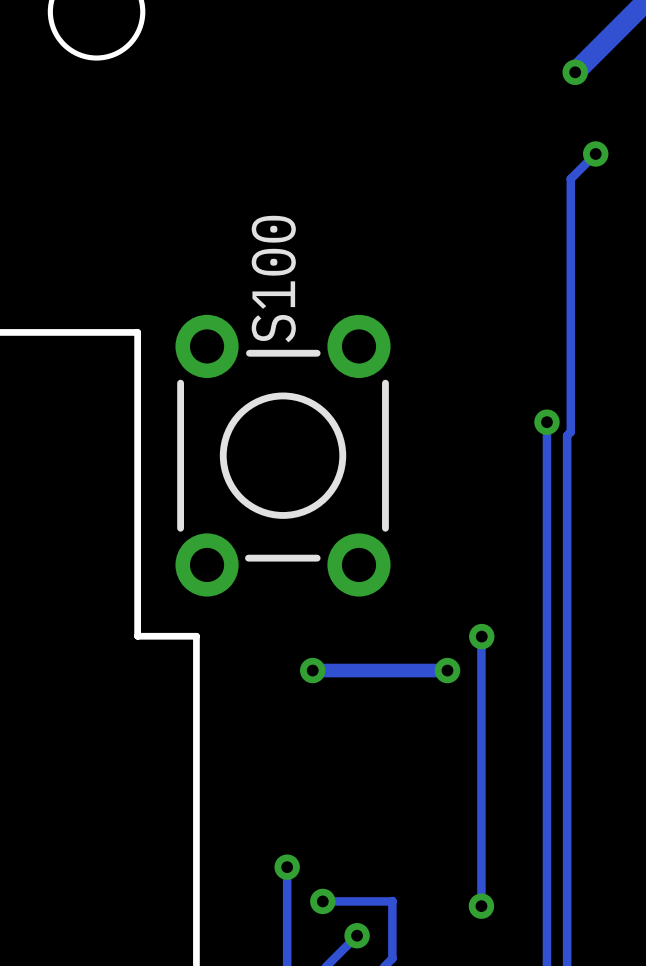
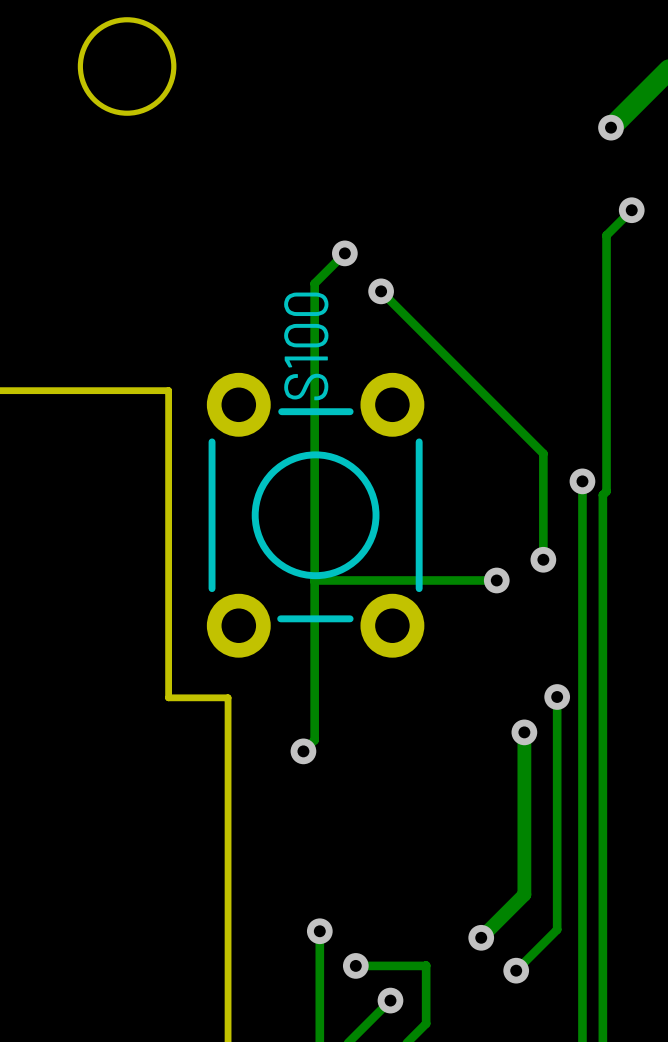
track: none -> (344, 253) (314, 283) (314, 740) (303, 751)
via: none -> (344, 253)
track: none -> (381, 291) (543, 453) (543, 559)
via: none -> (381, 291)
via: none -> (543, 559)
track: none -> (496, 580) (314, 581)
via: none -> (496, 580)
via: none -> (557, 697)
track: (481, 636) (481, 906) -> (557, 697) (557, 929) (516, 970)
via: (481, 636) -> none
via position: (312, 670) -> (303, 751)
track: (447, 670) (312, 670) -> none
via: (447, 670) -> none
track: none -> (524, 732) (524, 894) (481, 937)
via: none -> (524, 732)
via: none -> (481, 937)

